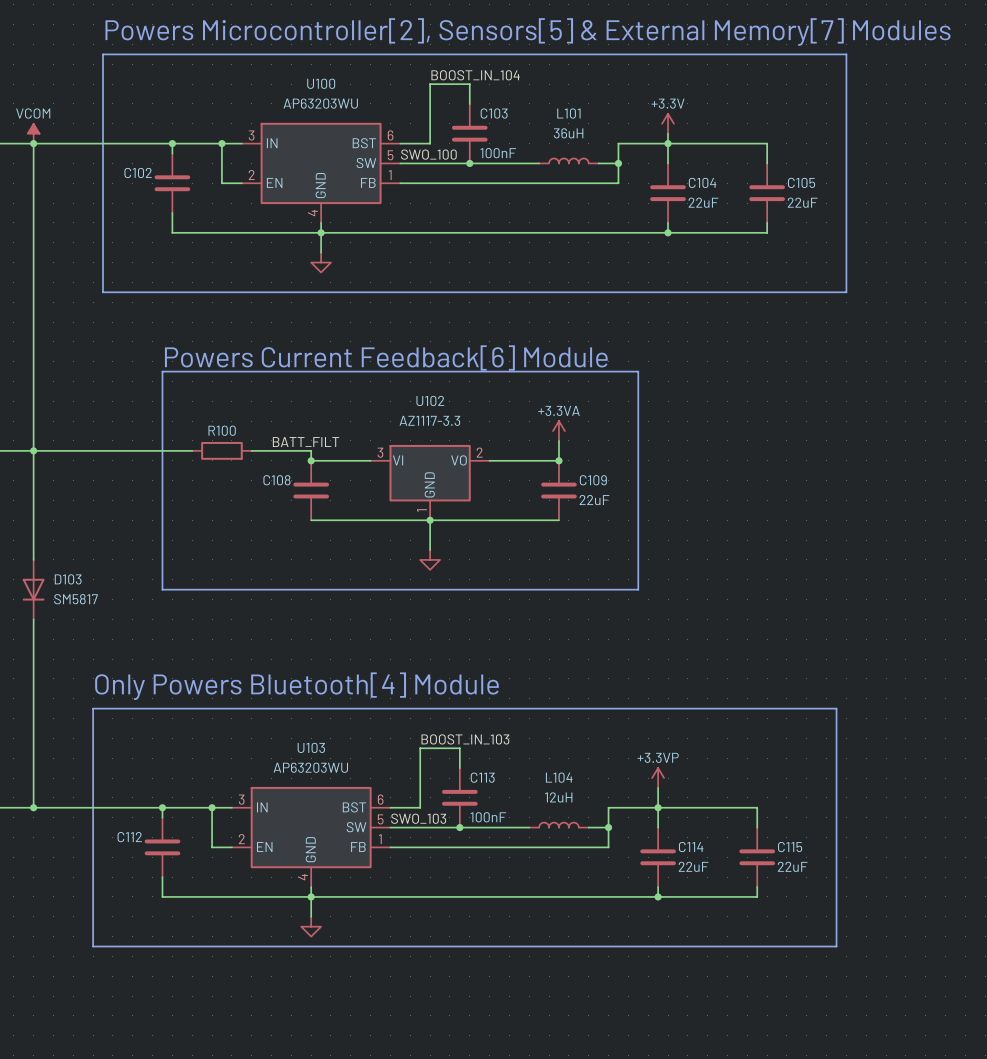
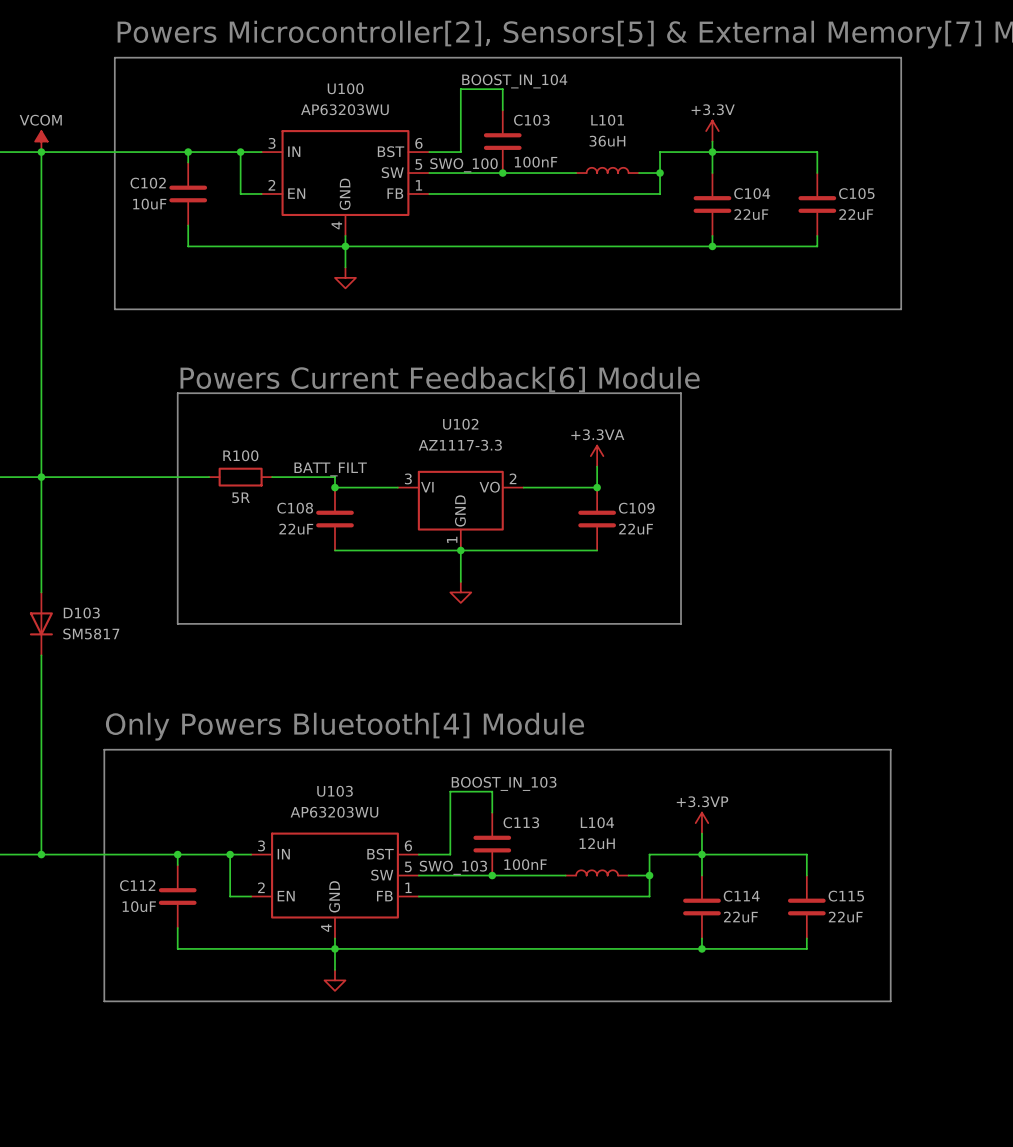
C102 value: none -> 10uF (149, 204)
R100 value: none -> 5R (240, 497)
C108 value: none -> 22uF (296, 529)
C112 value: none -> 10uF (139, 906)

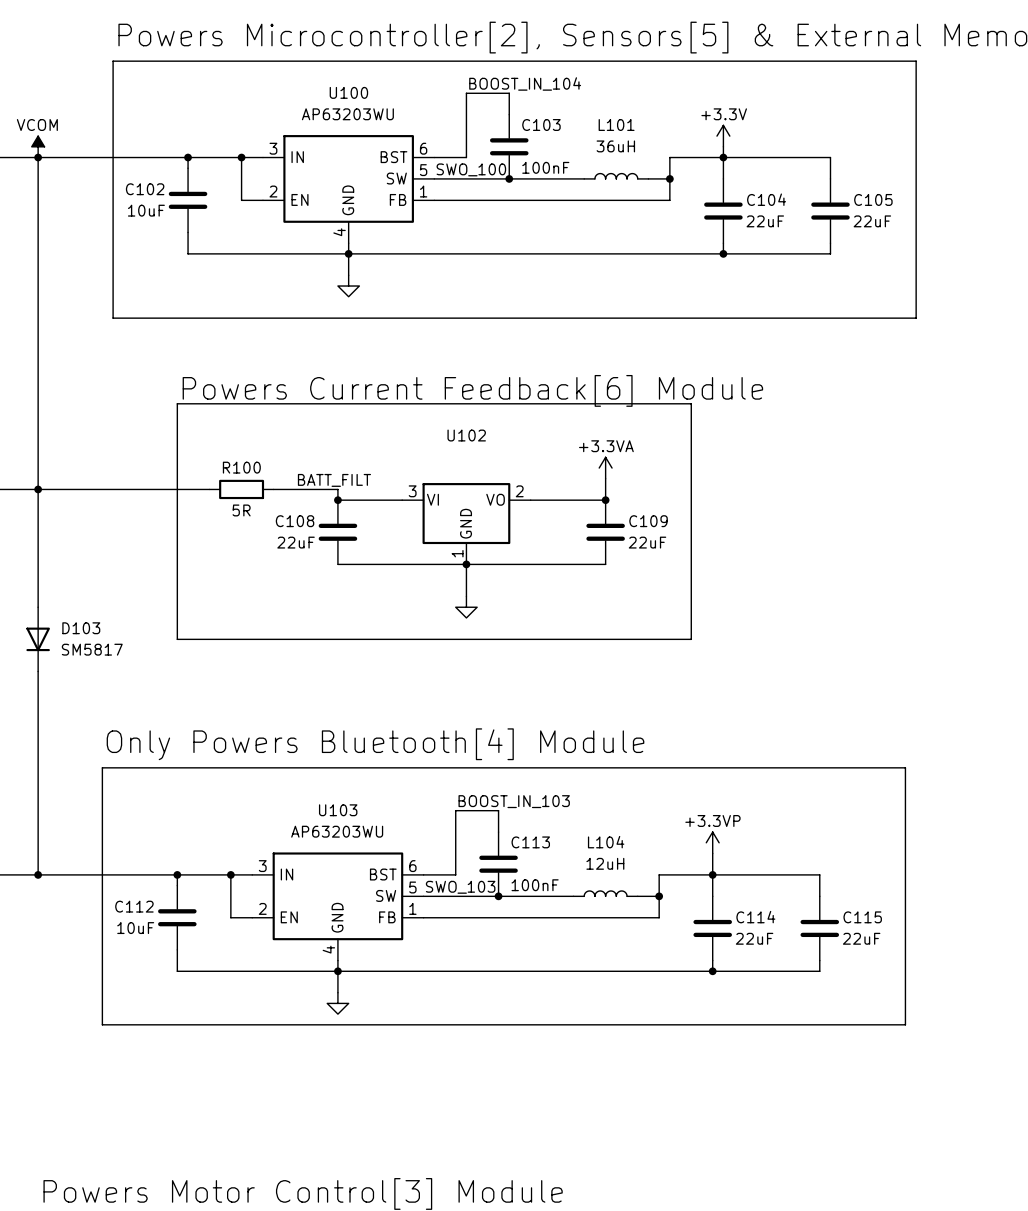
U102 value: AZ1117-3.3 (460, 445) -> none

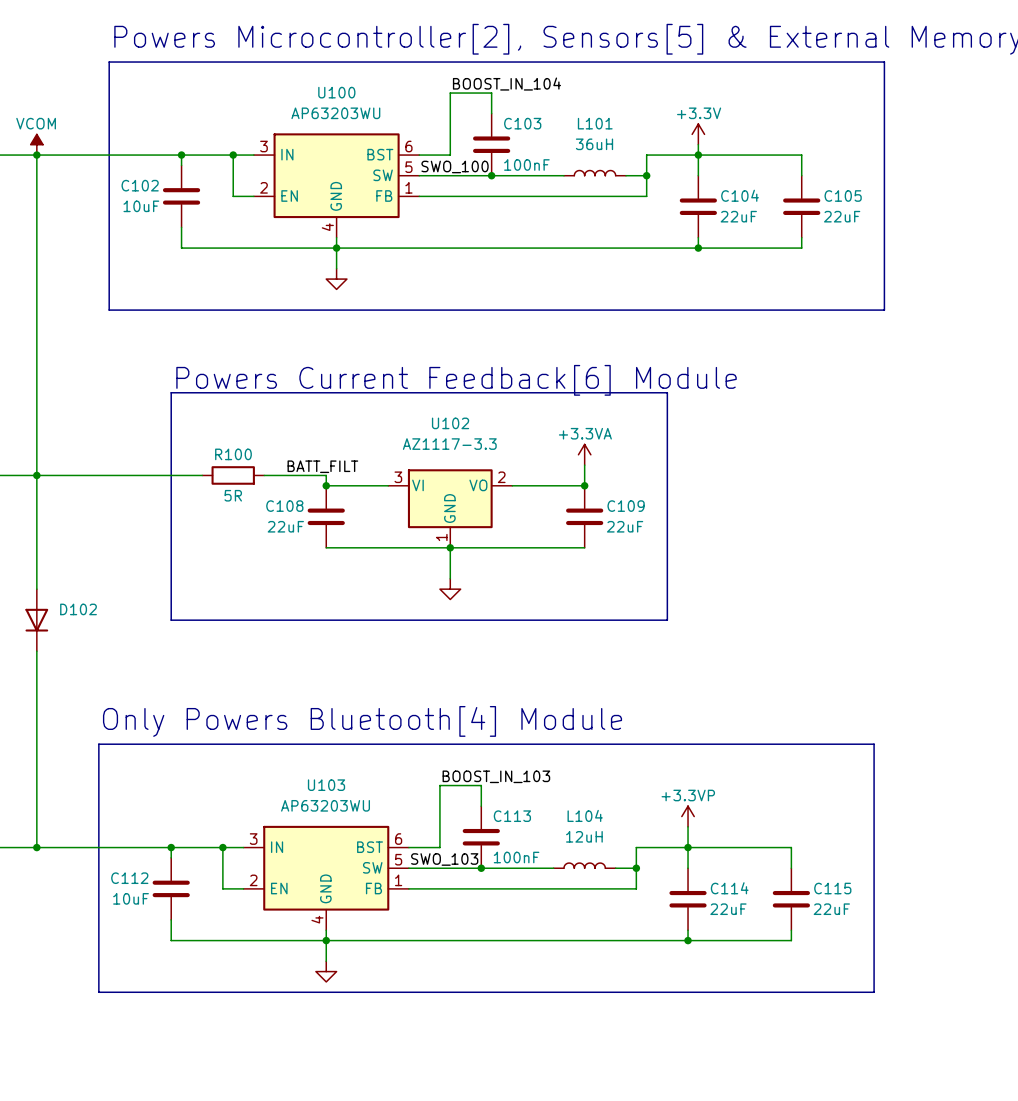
U102 value: none -> AZ1117-3.3 (449, 444)
D103 name: D103 (81, 628) -> D102 (78, 609)
D103 value: SM5817 (92, 649) -> none

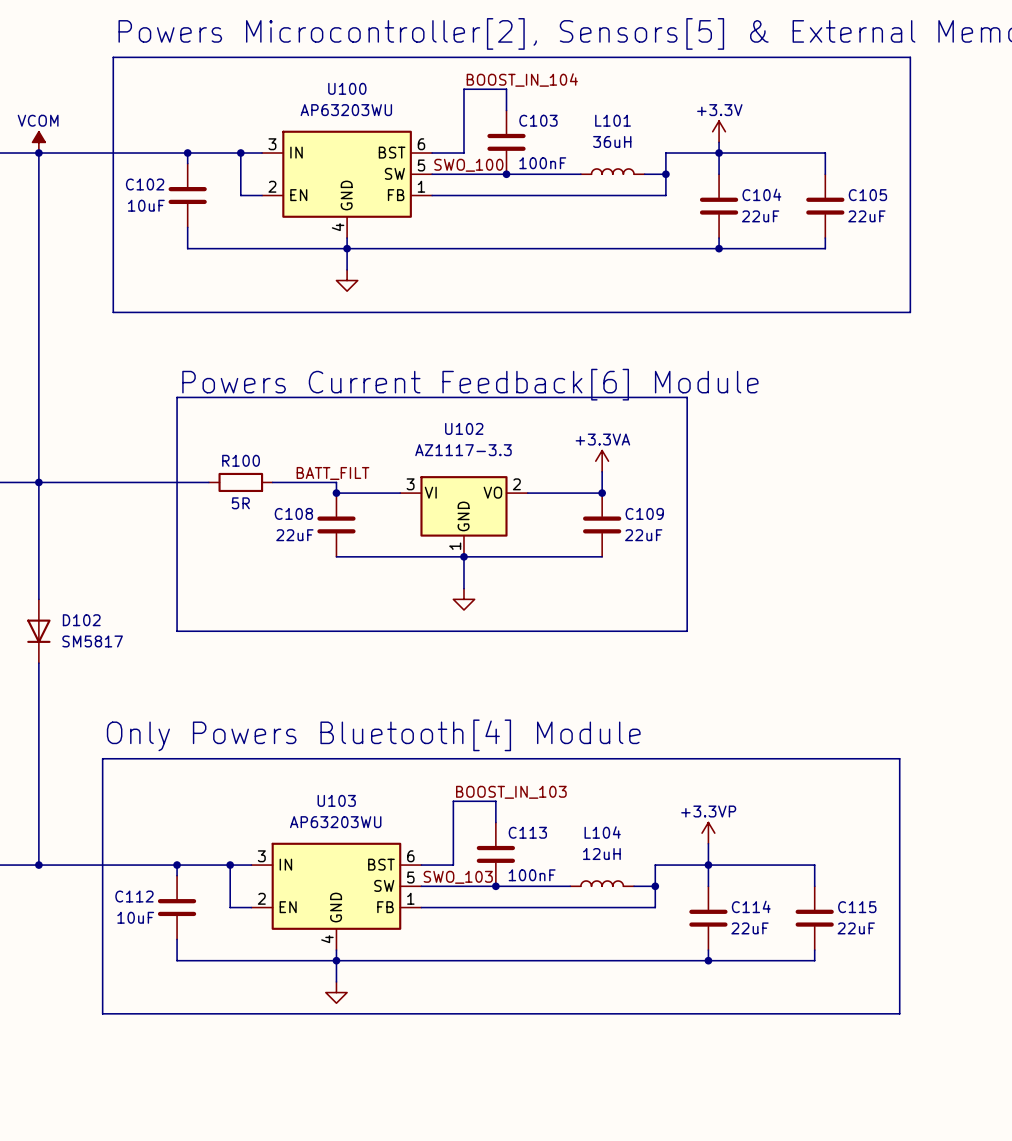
D102 value: none -> SM5817 (92, 641)

